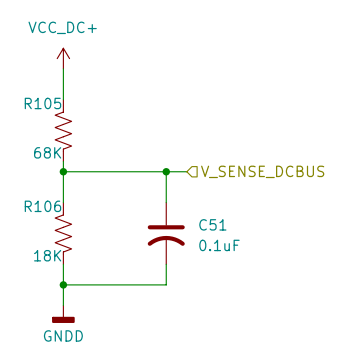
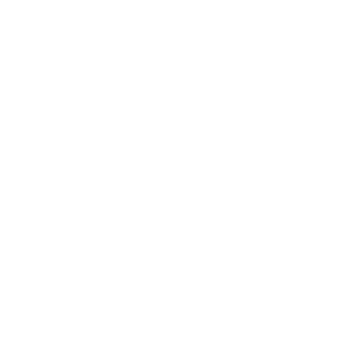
power symbol: VCC_DC+ (63, 58) -> none
wire: (63, 68) (63, 99) -> none
R105: 68K (63, 130) -> none
wire: (63, 161) (63, 202) -> none
wire: (63, 171) (186, 171) -> none
junction: (63, 171) -> none
wire: (166, 171) (166, 202) -> none
junction: (166, 171) -> none
hierarchical label: V_SENSE_DCBUS (262, 171) -> none
R106: 18K (63, 233) -> none
C51: 0.1uF (166, 233) -> none
wire: (63, 264) (63, 305) -> none
wire: (166, 264) (166, 284) (63, 284) -> none
junction: (63, 284) -> none
power symbol: GNDD (63, 314) -> none

